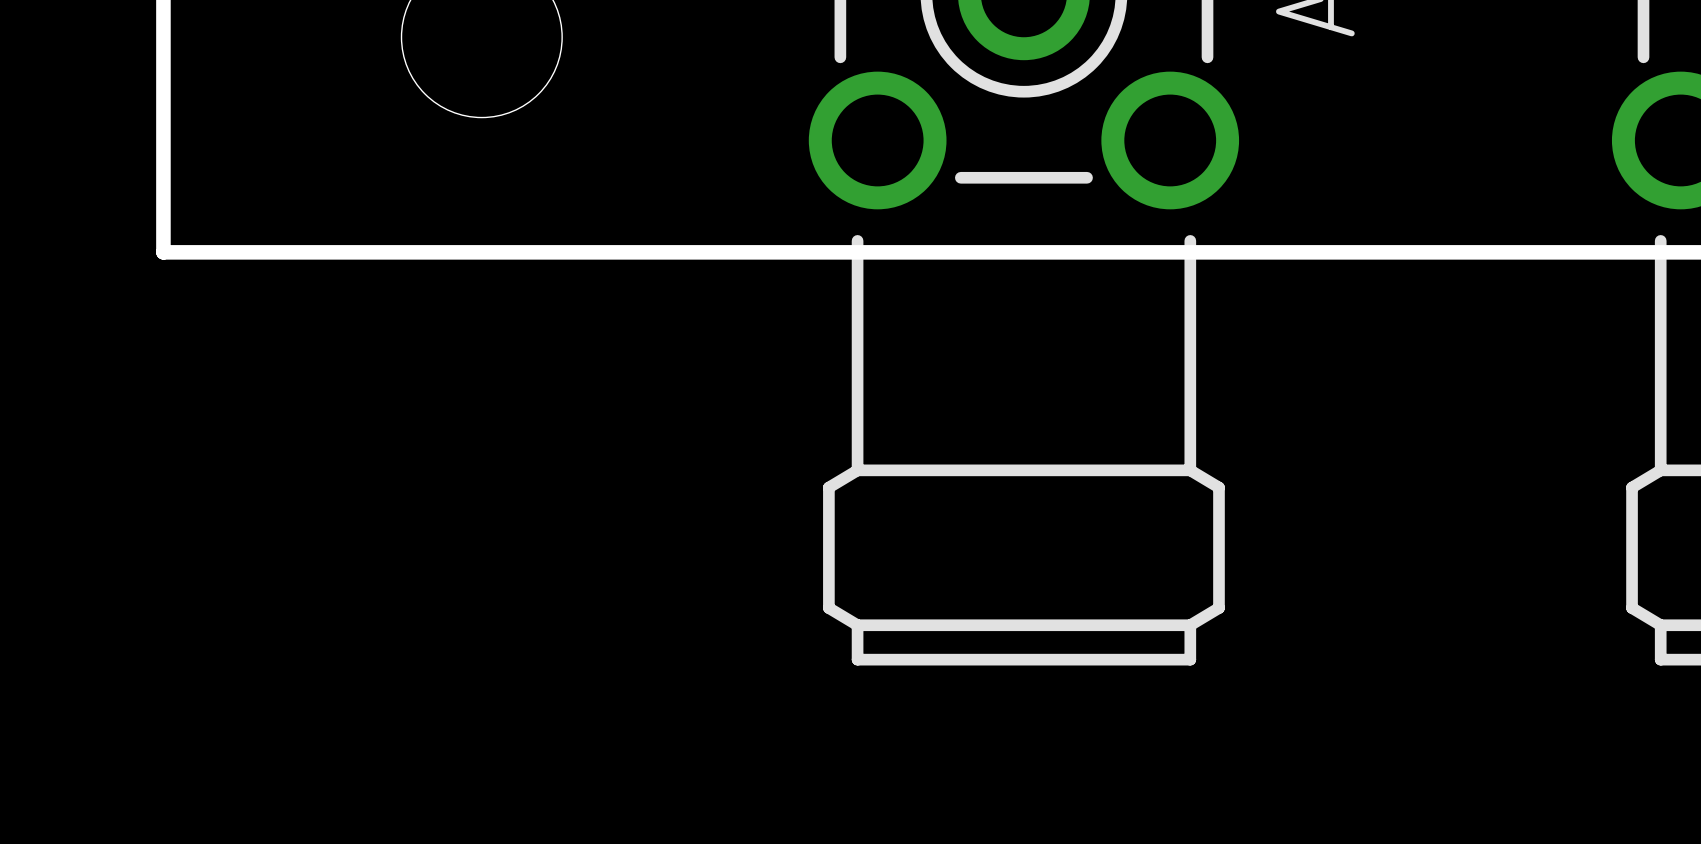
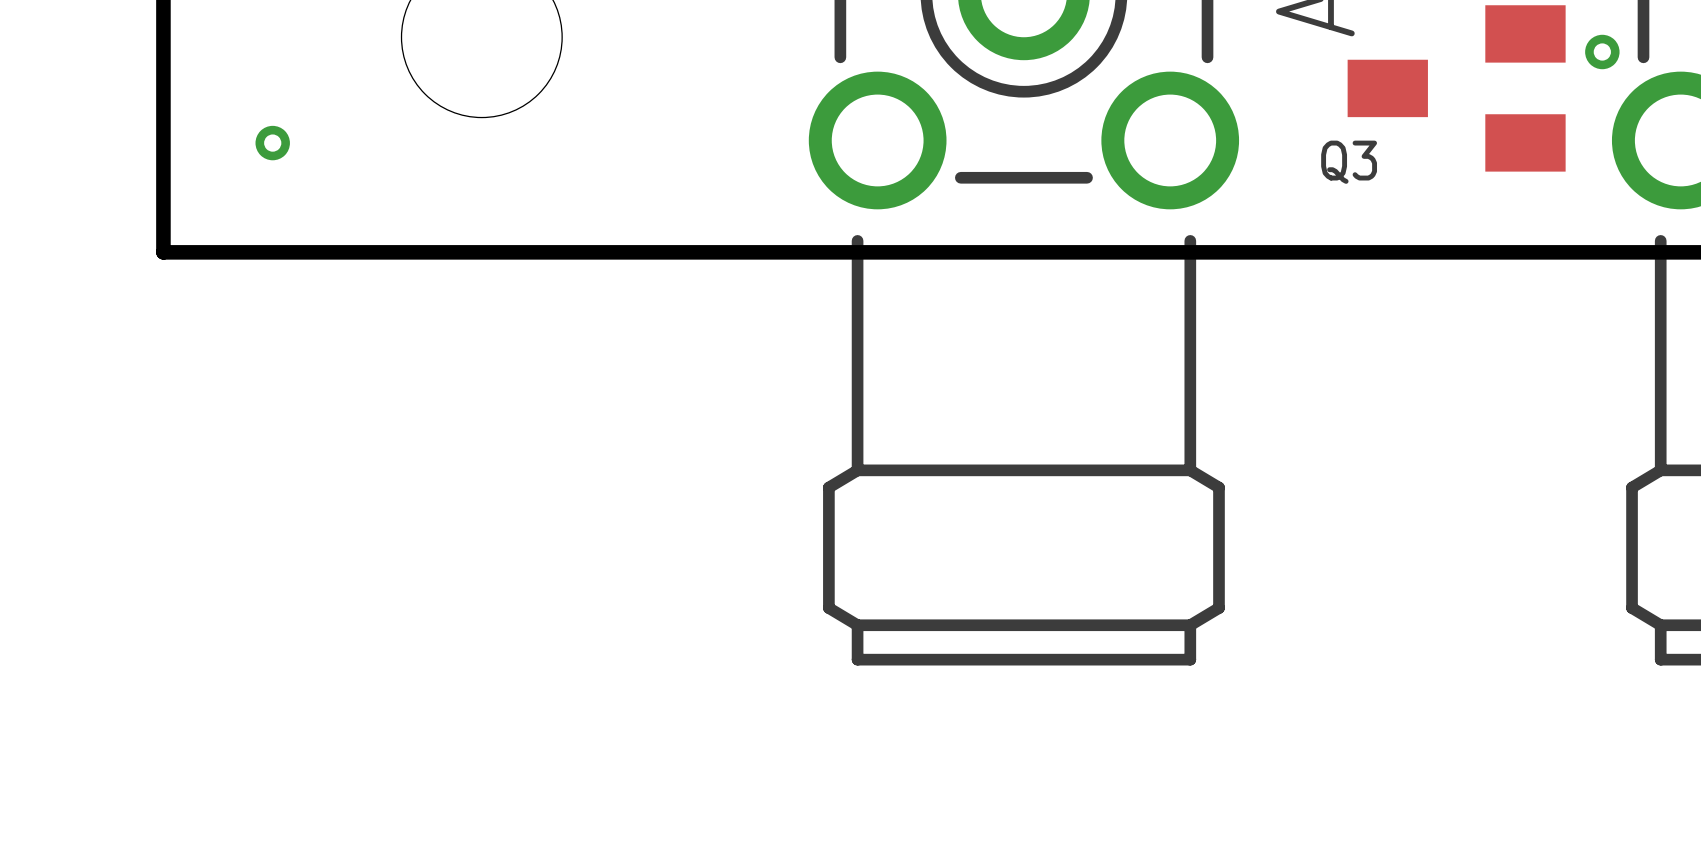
via: none -> (1602, 52)
Q3: none -> (1456, 88)
via: none -> (272, 143)

